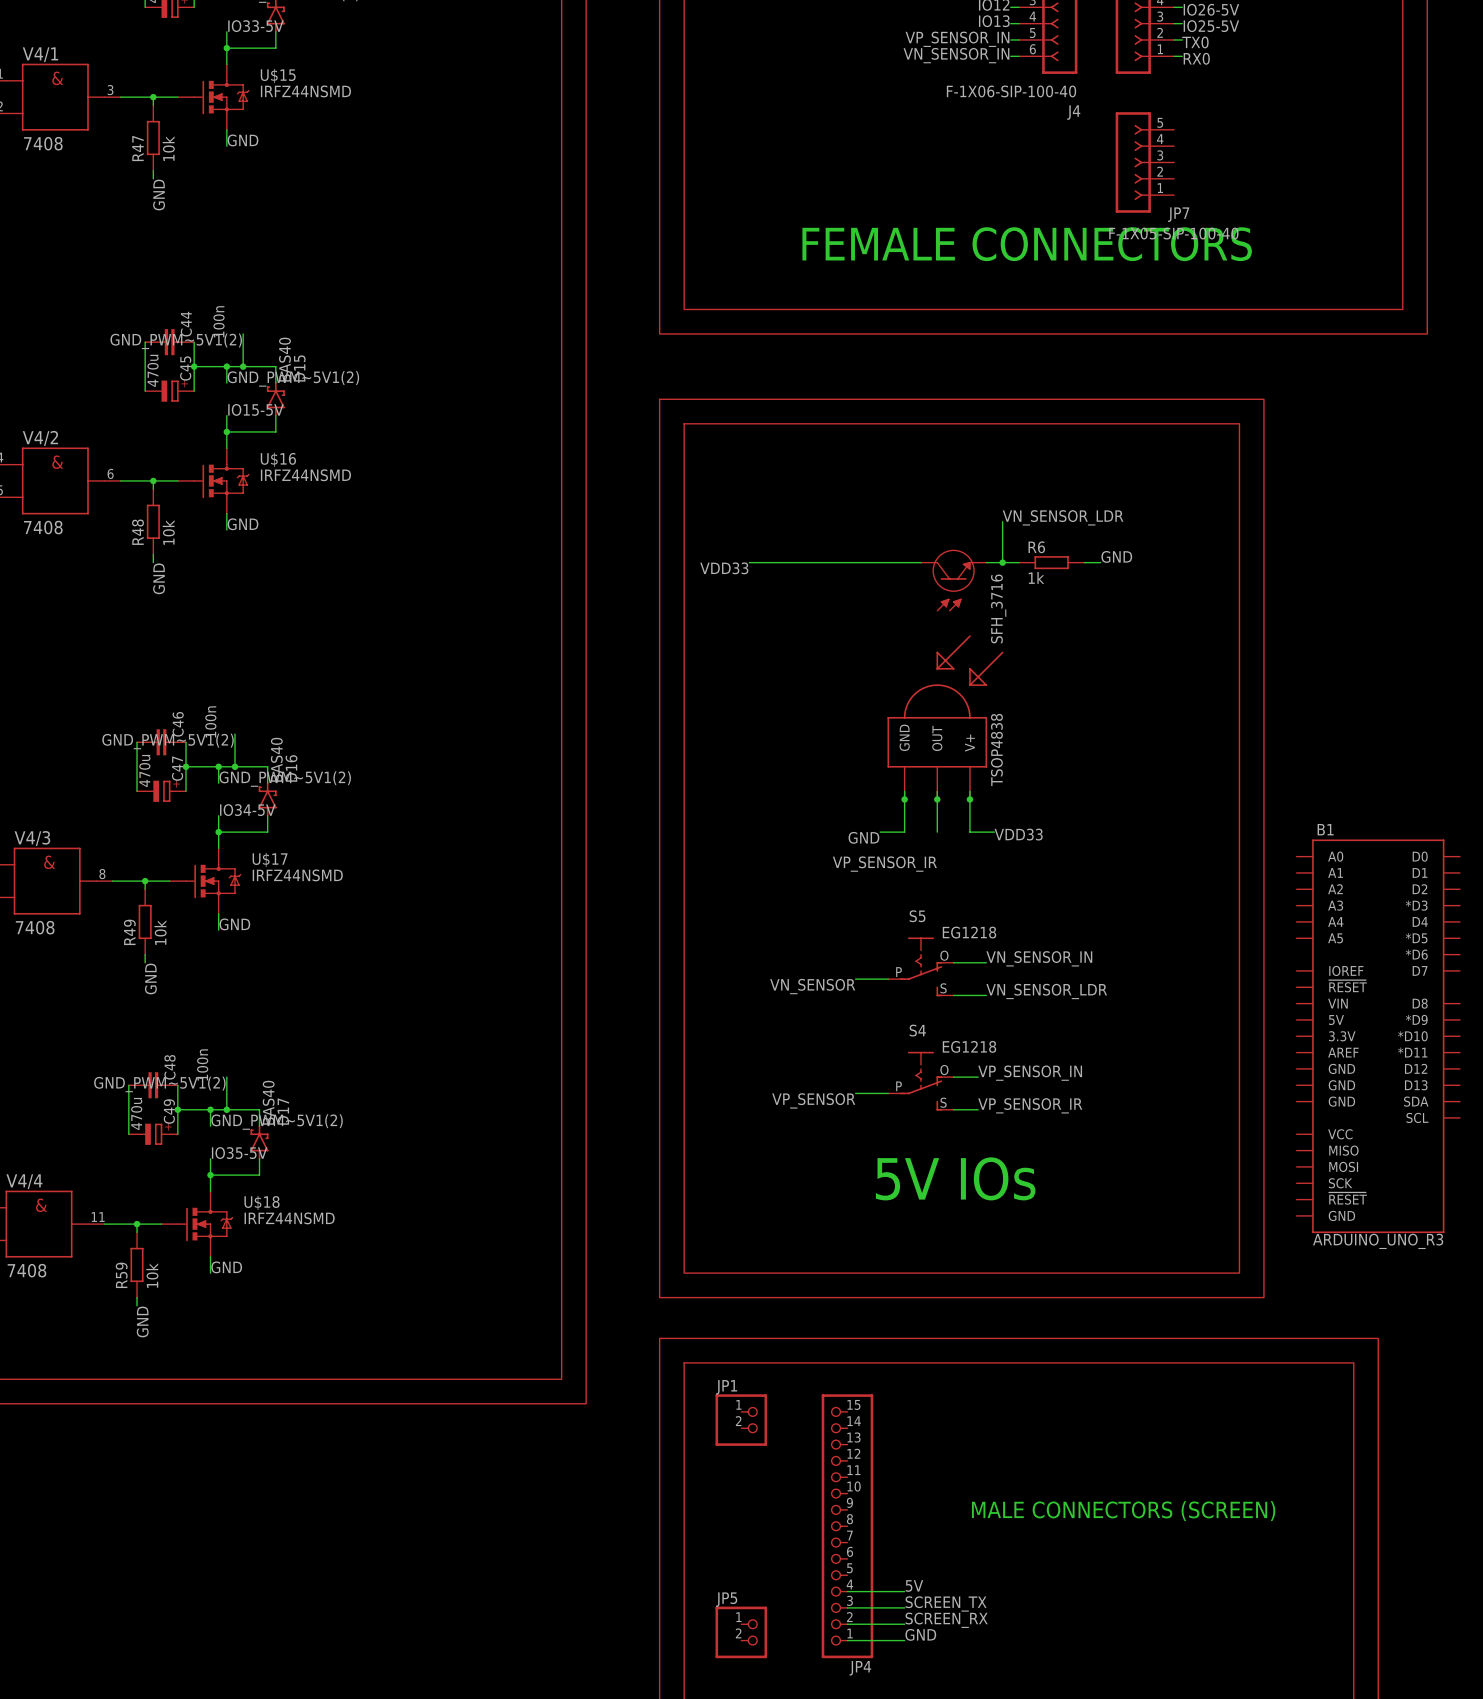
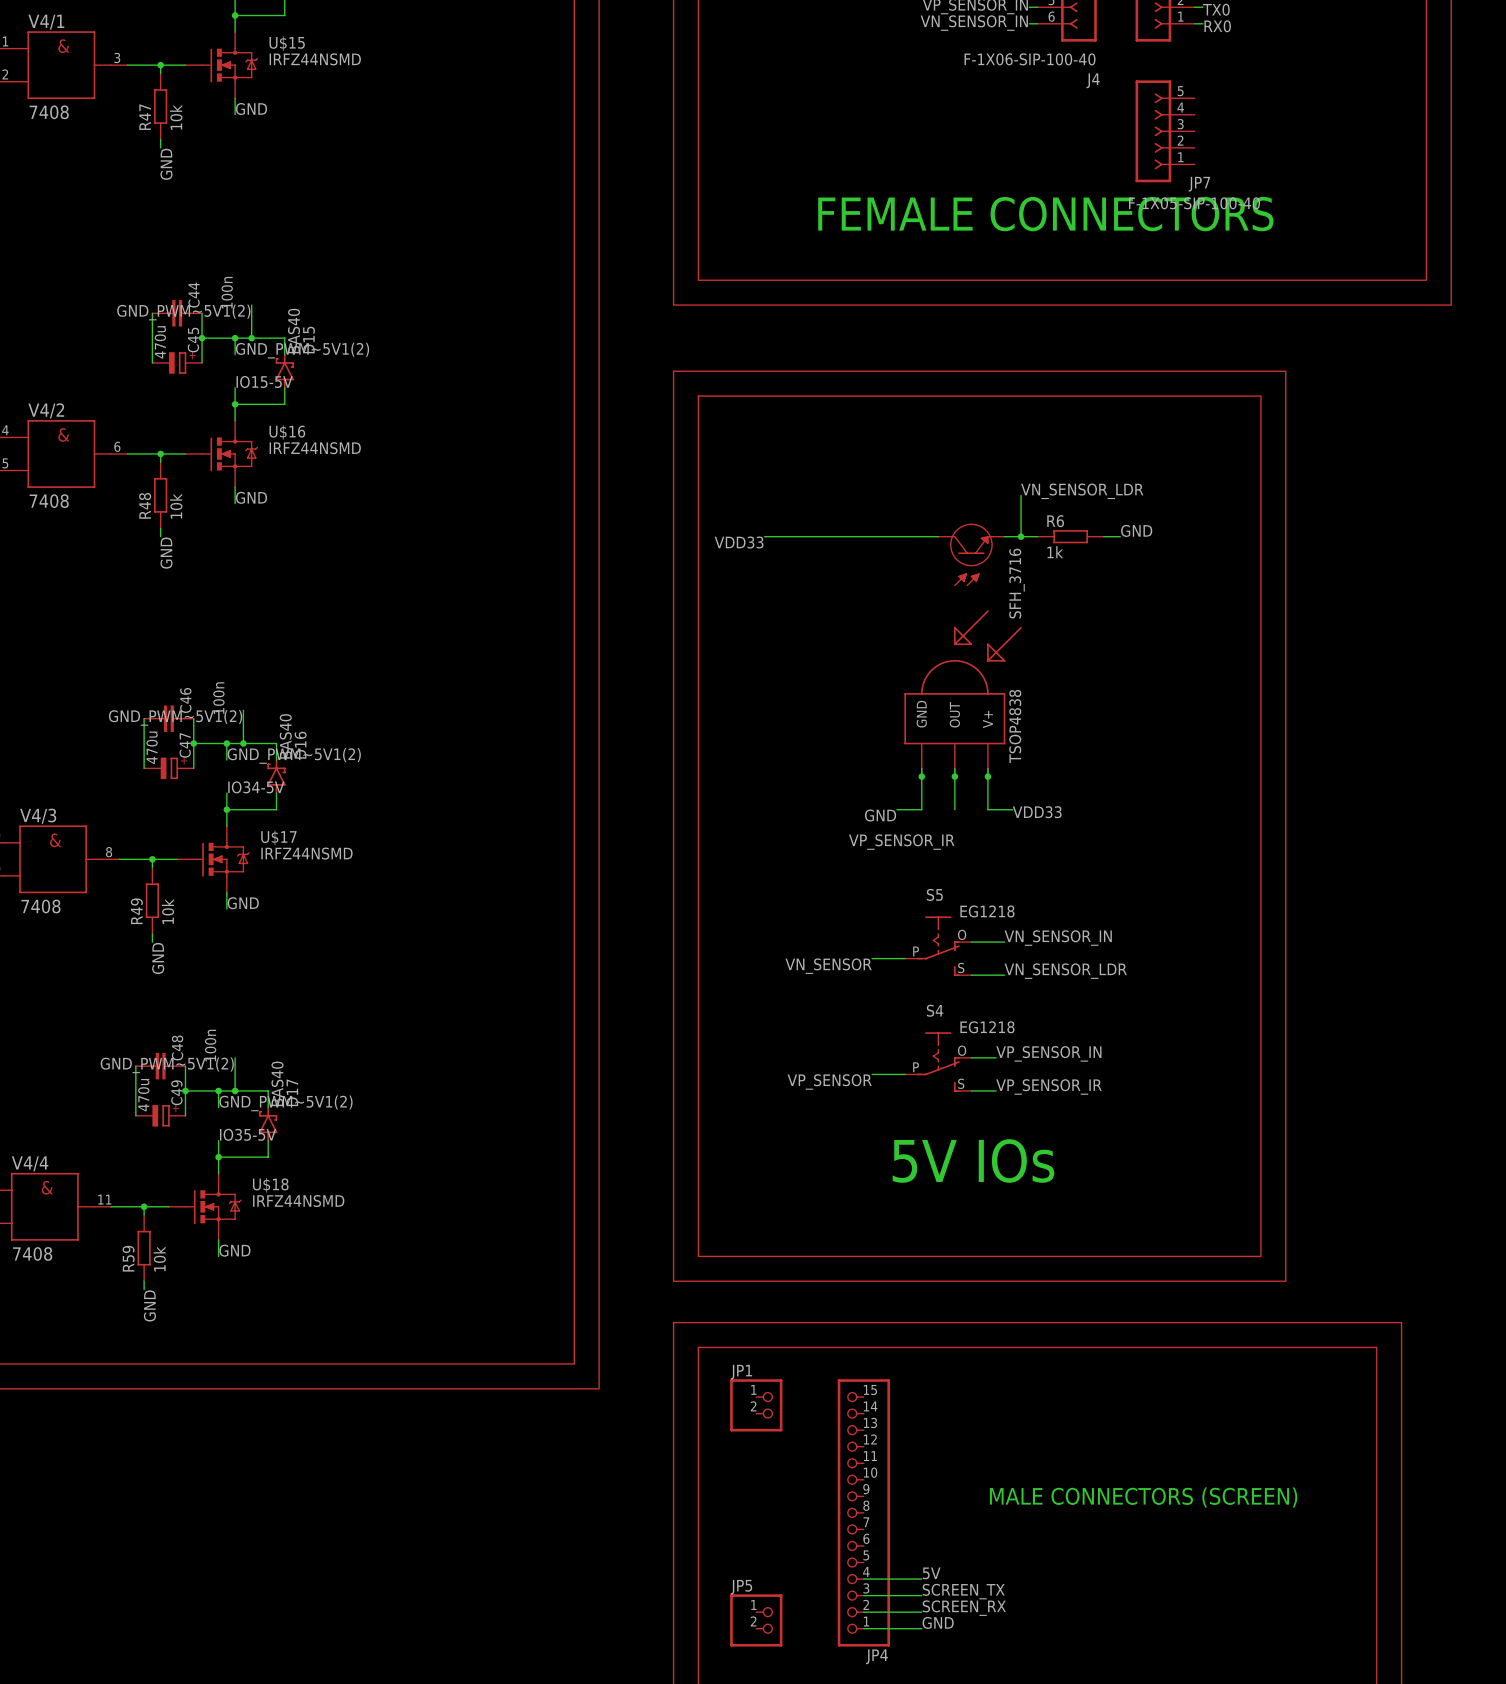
B1: ARDUINO_UNO_R3 (1378, 1036) -> none

